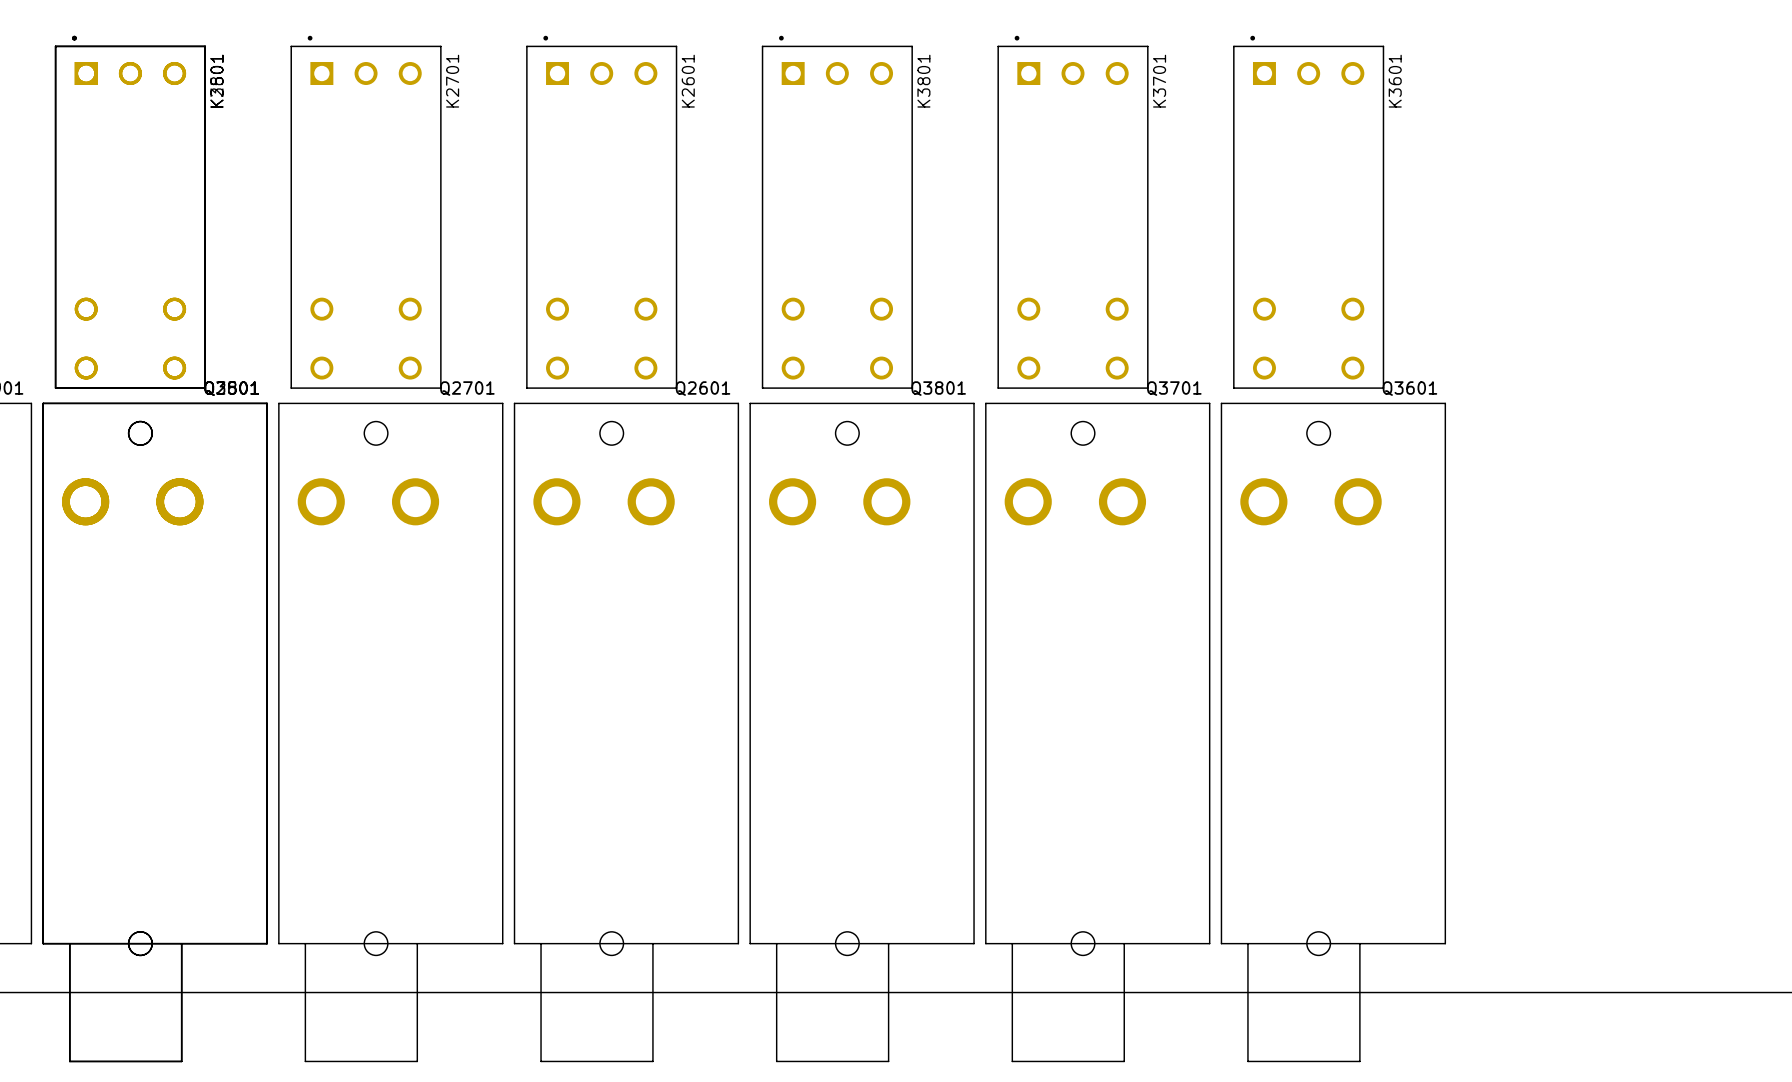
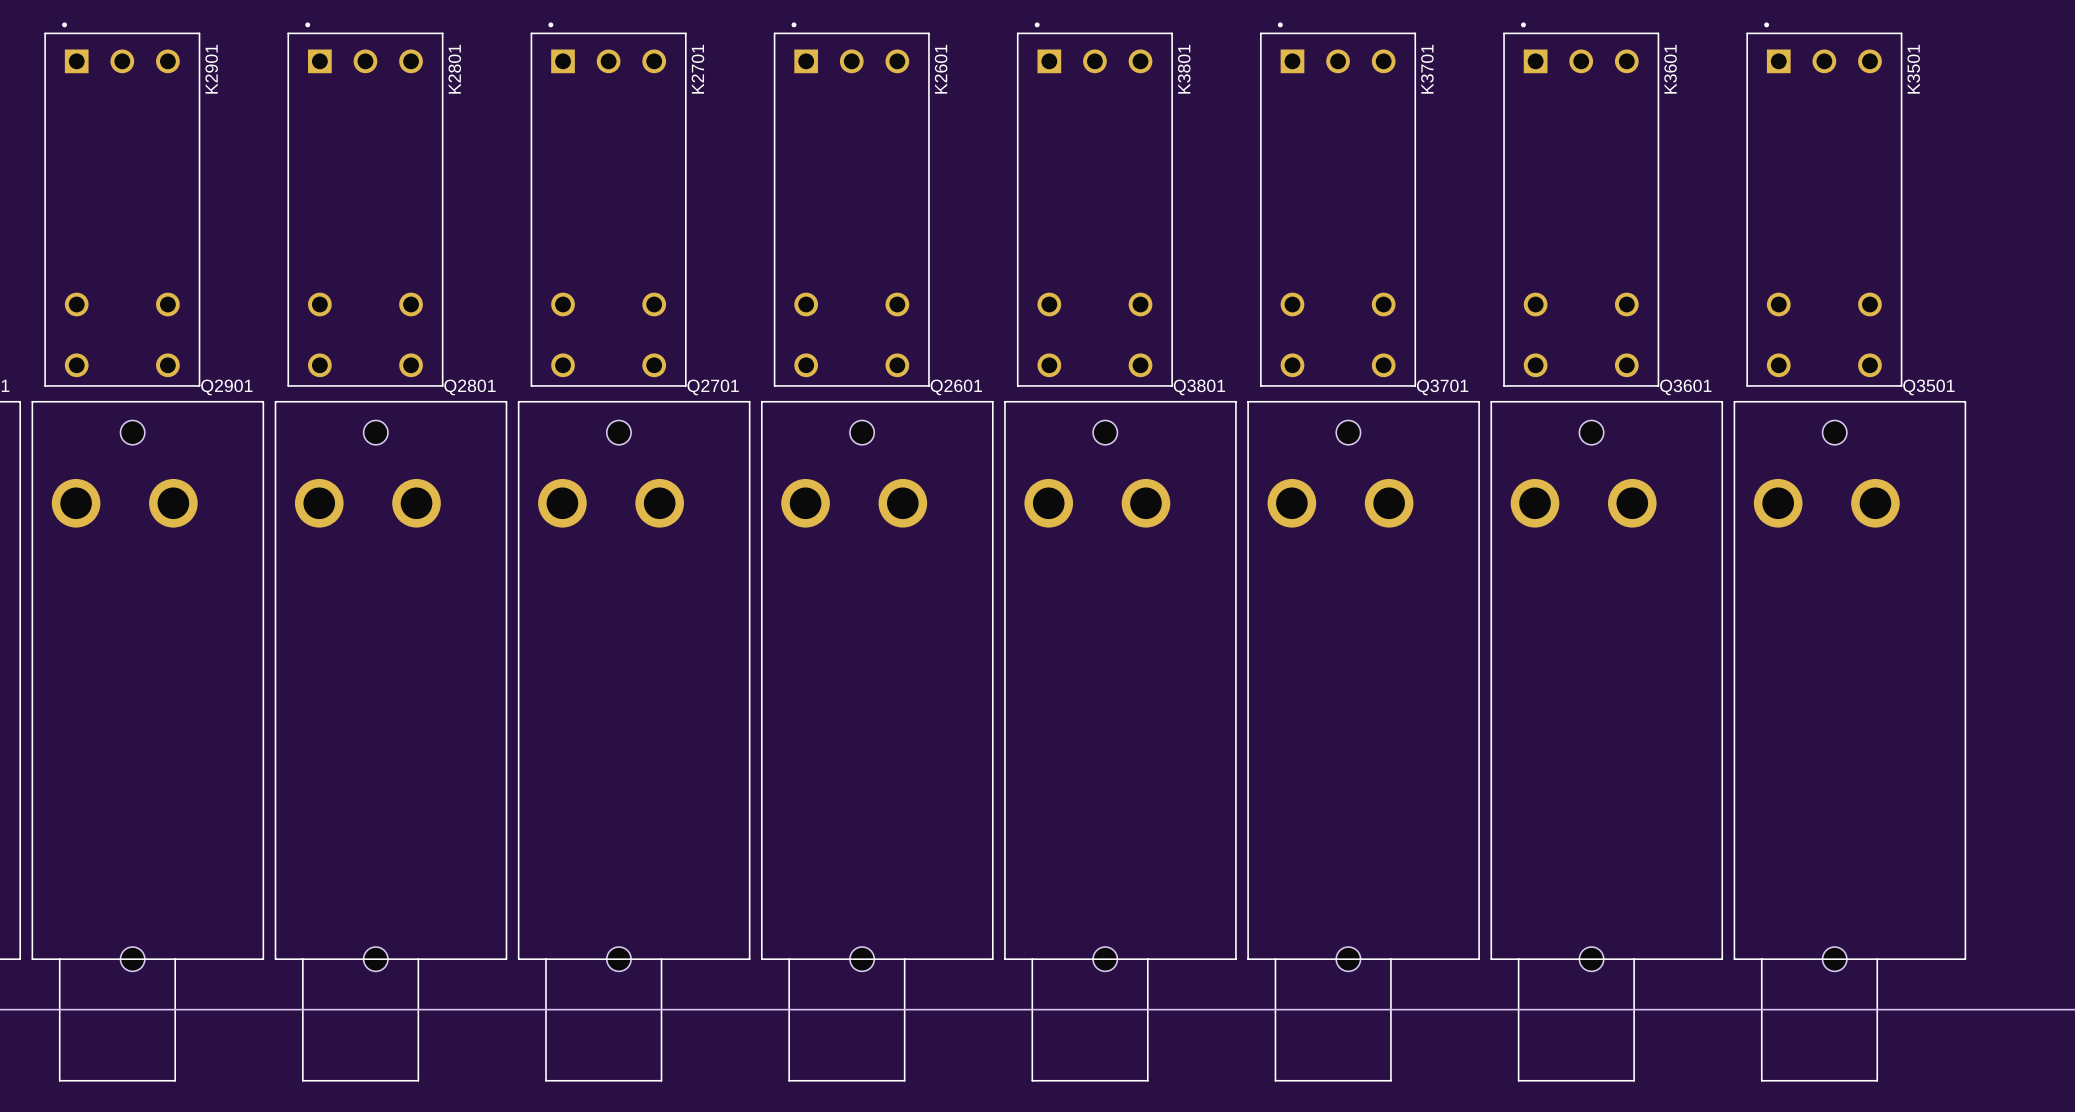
K3501 position: (130, 212) -> (1824, 204)
Q3501 position: (155, 732) -> (1849, 741)

